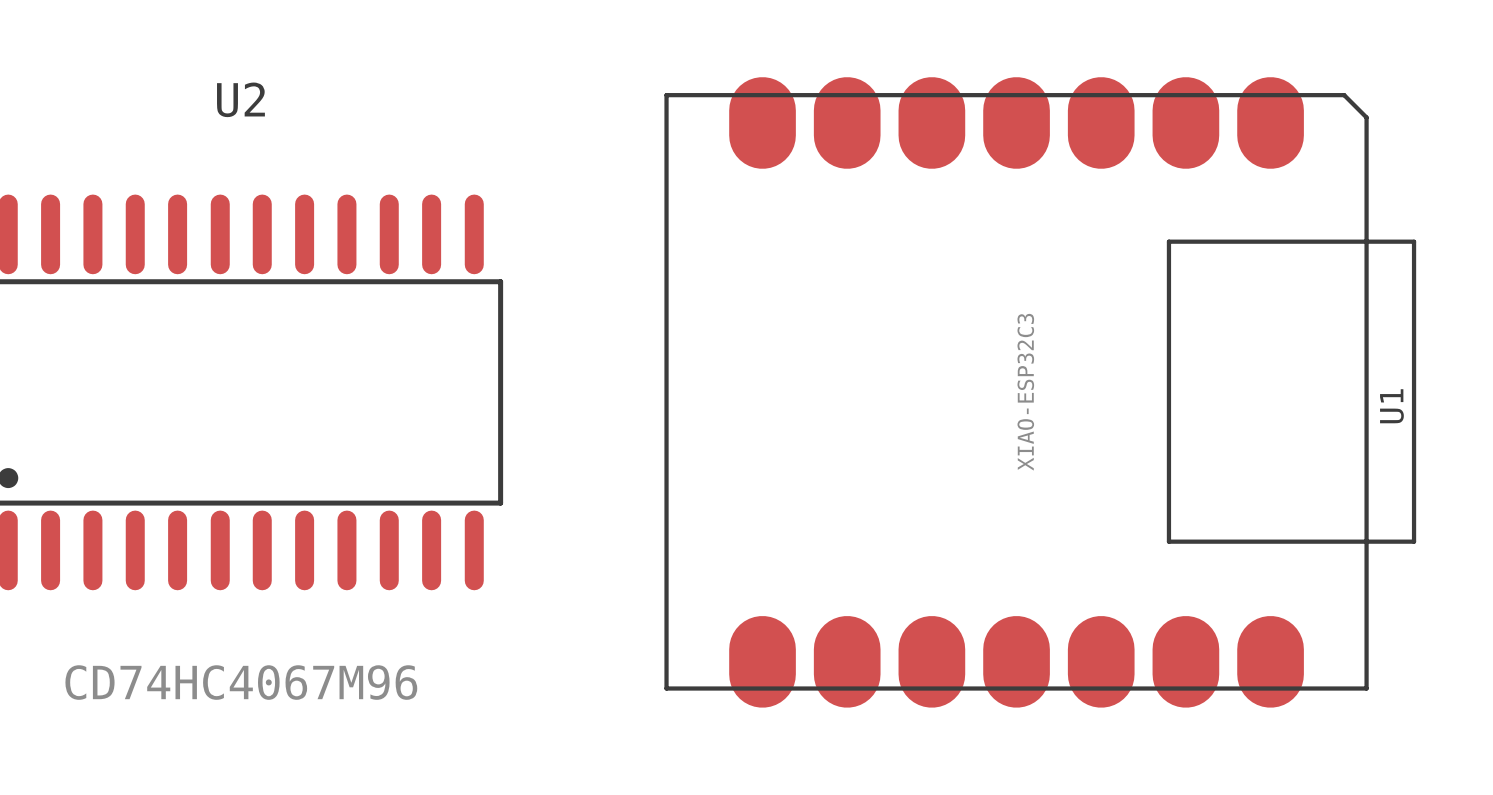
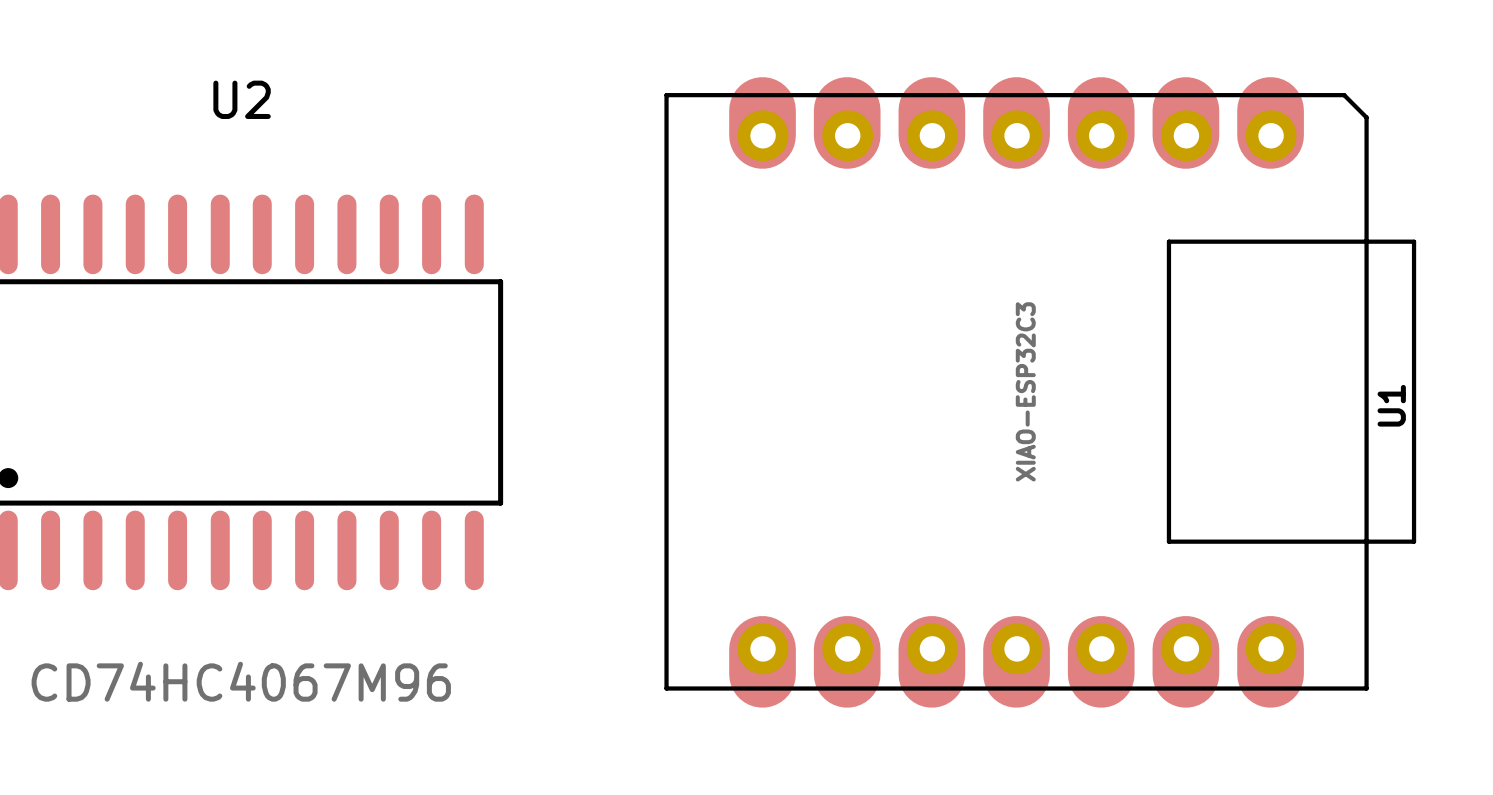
U1 footprint: [664, 77, 1417, 708] -> [664, 77, 1417, 708]

